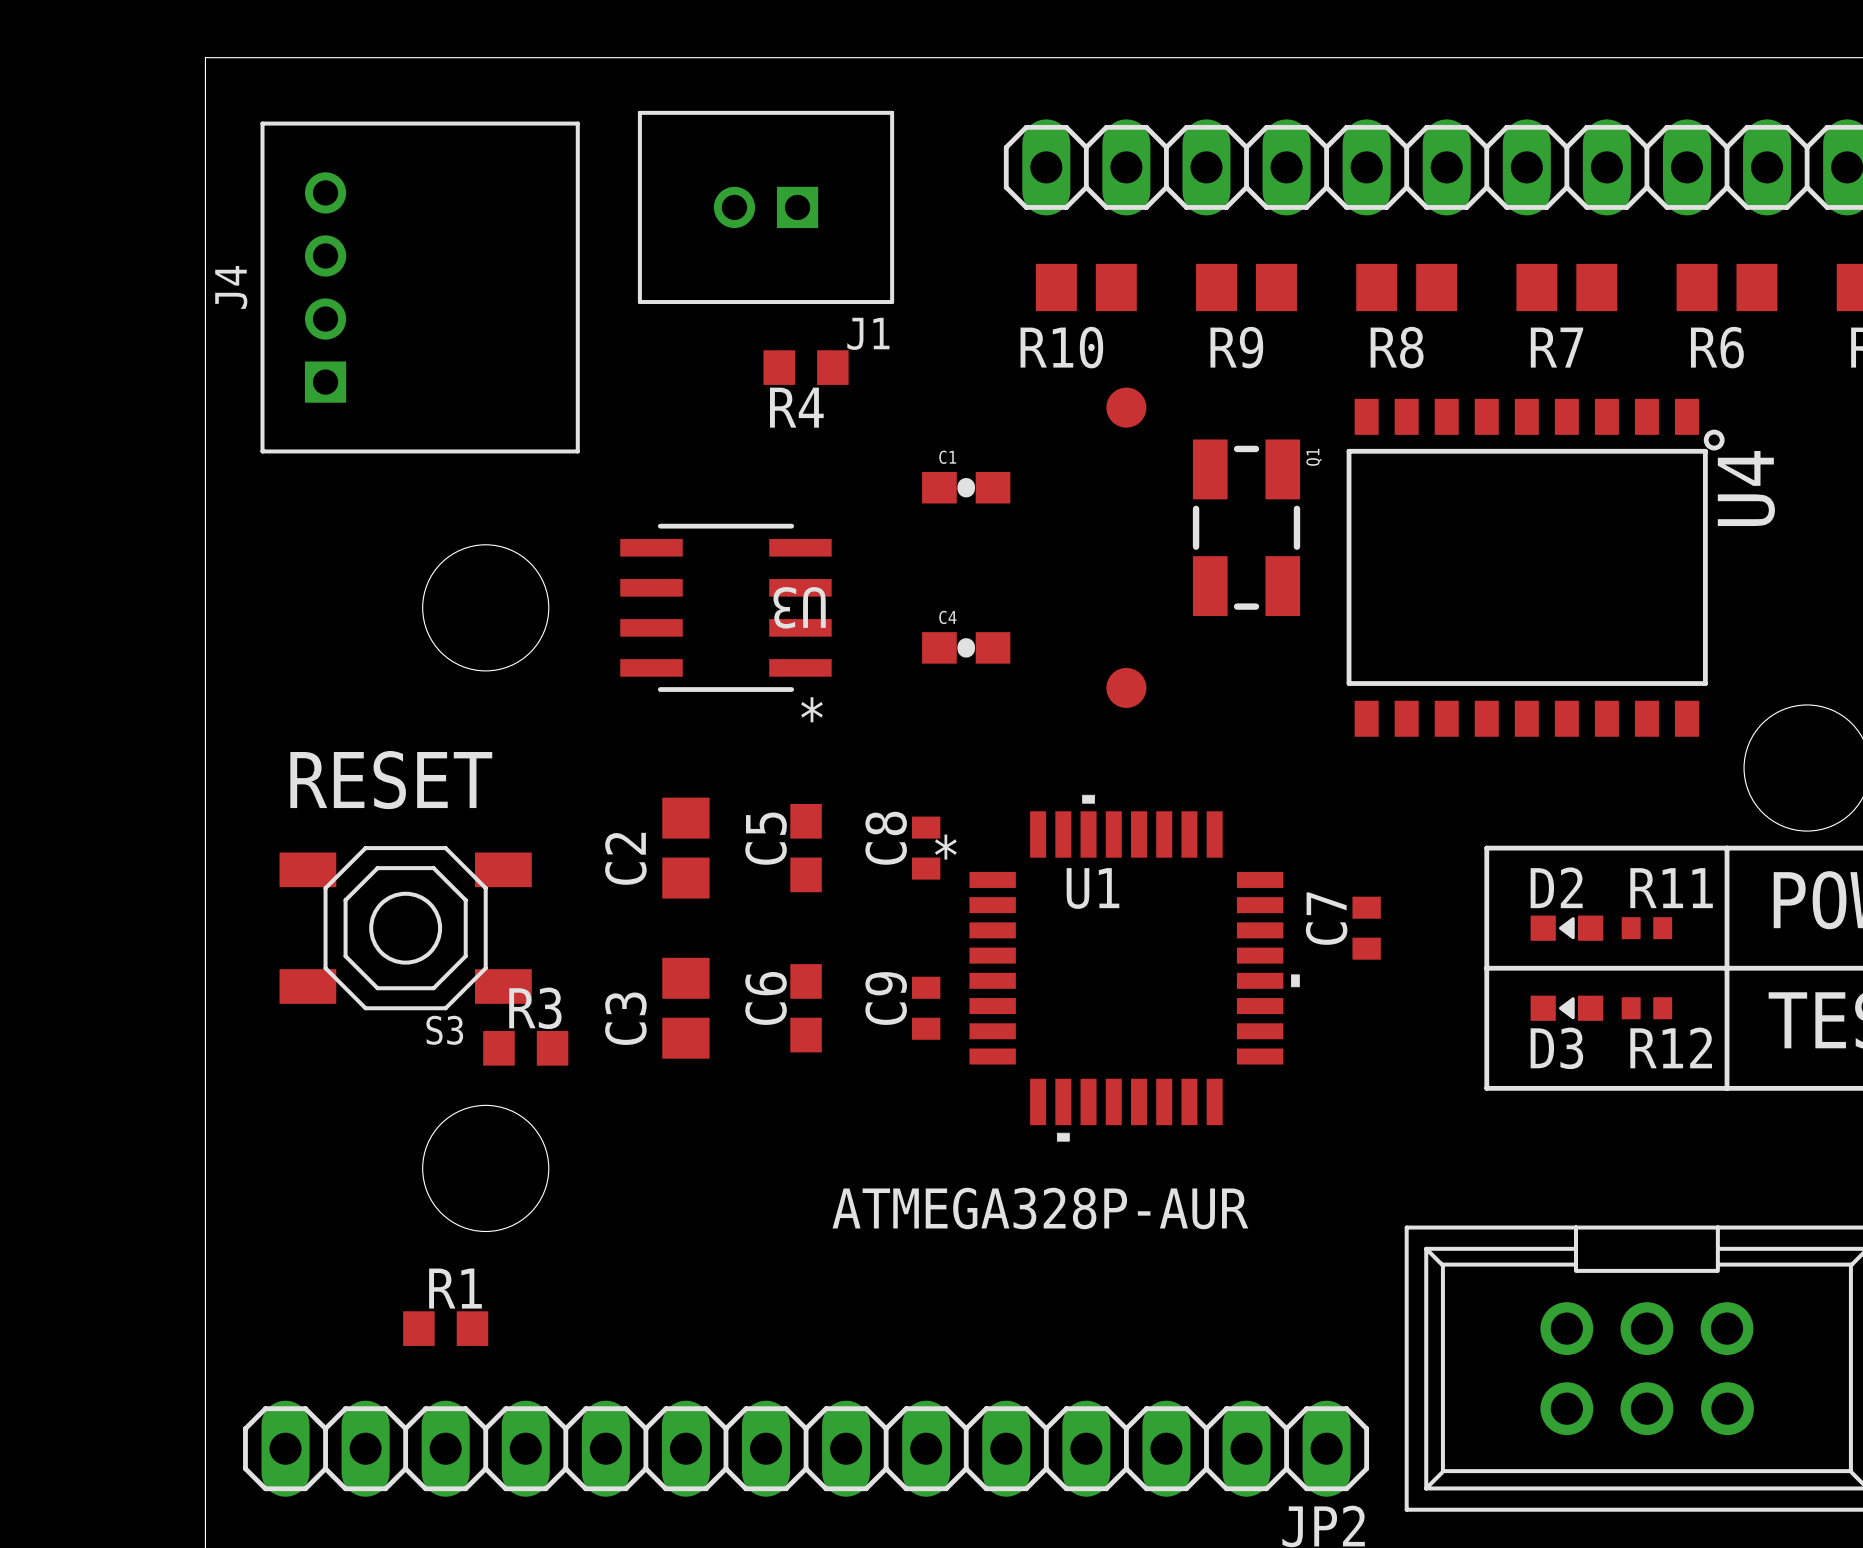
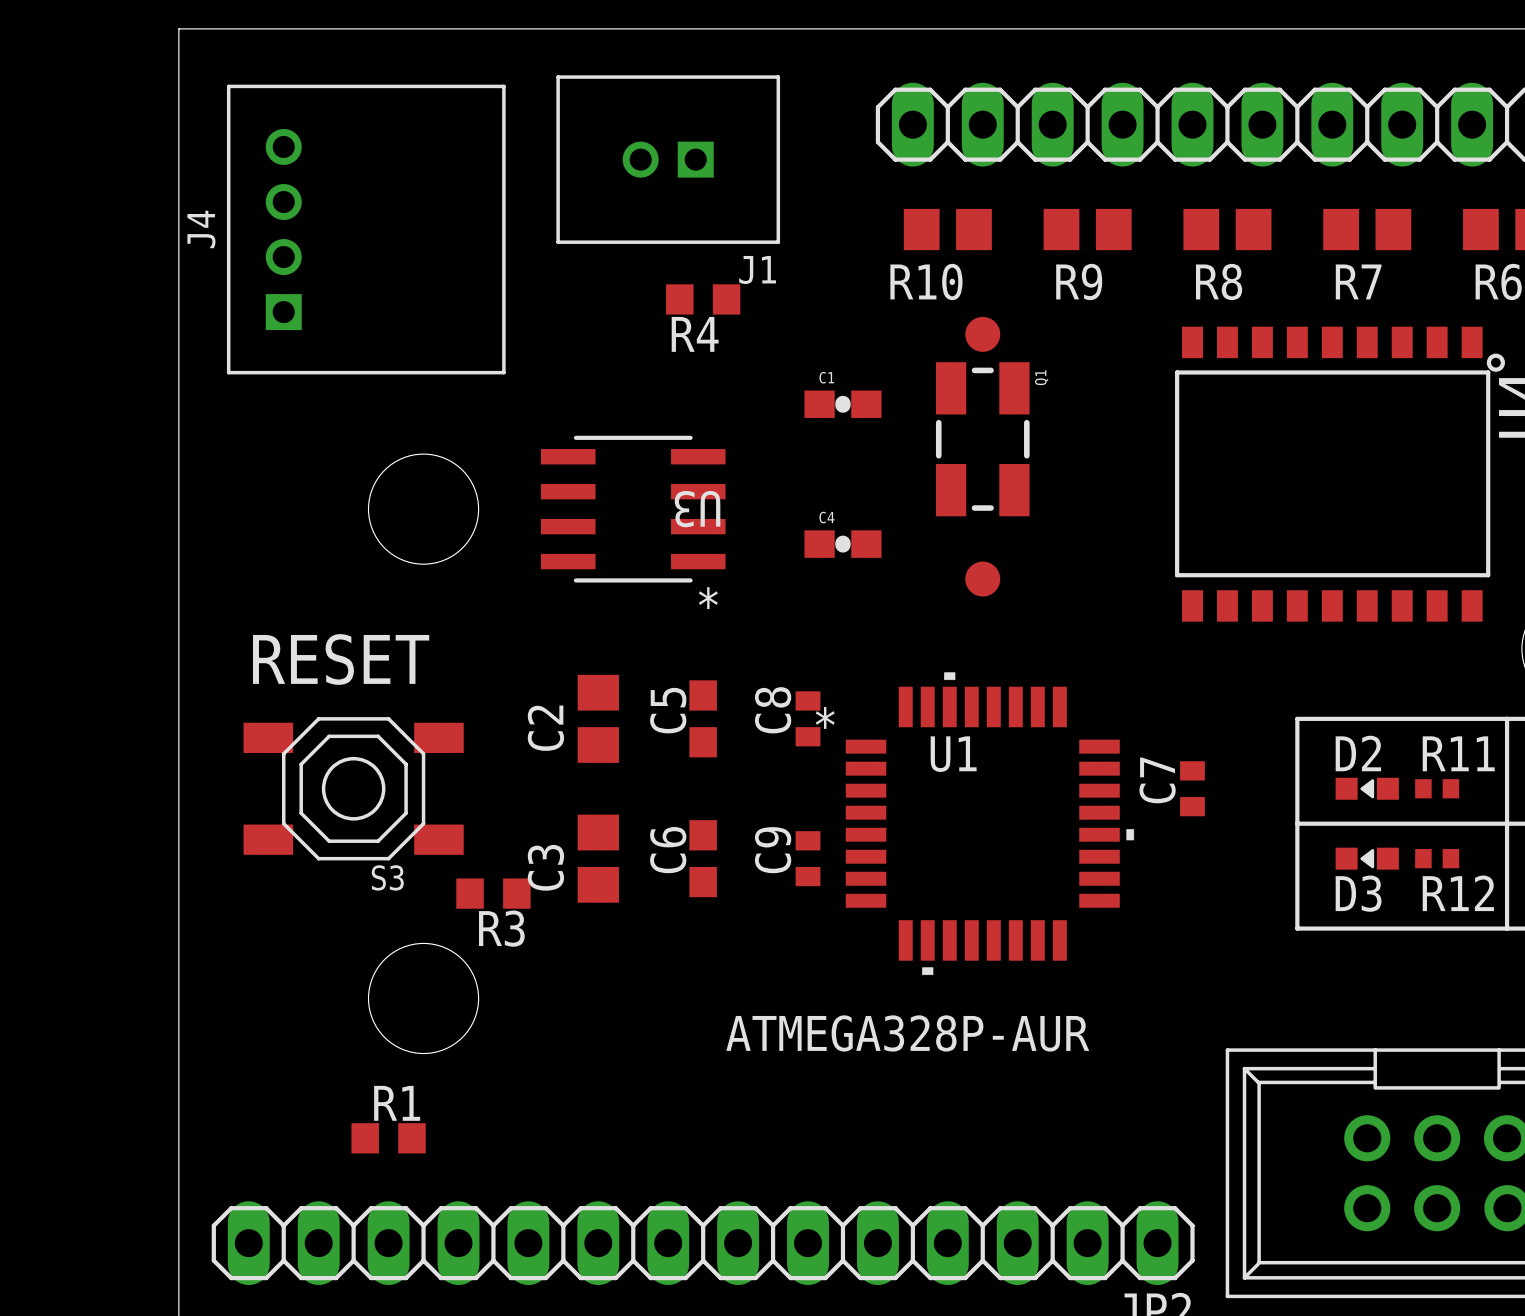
Q1 position: (1246, 527) -> (982, 439)
R3 name position: R3 (535, 1008) -> R3 (501, 928)
R3 position: (525, 1048) -> (493, 893)

